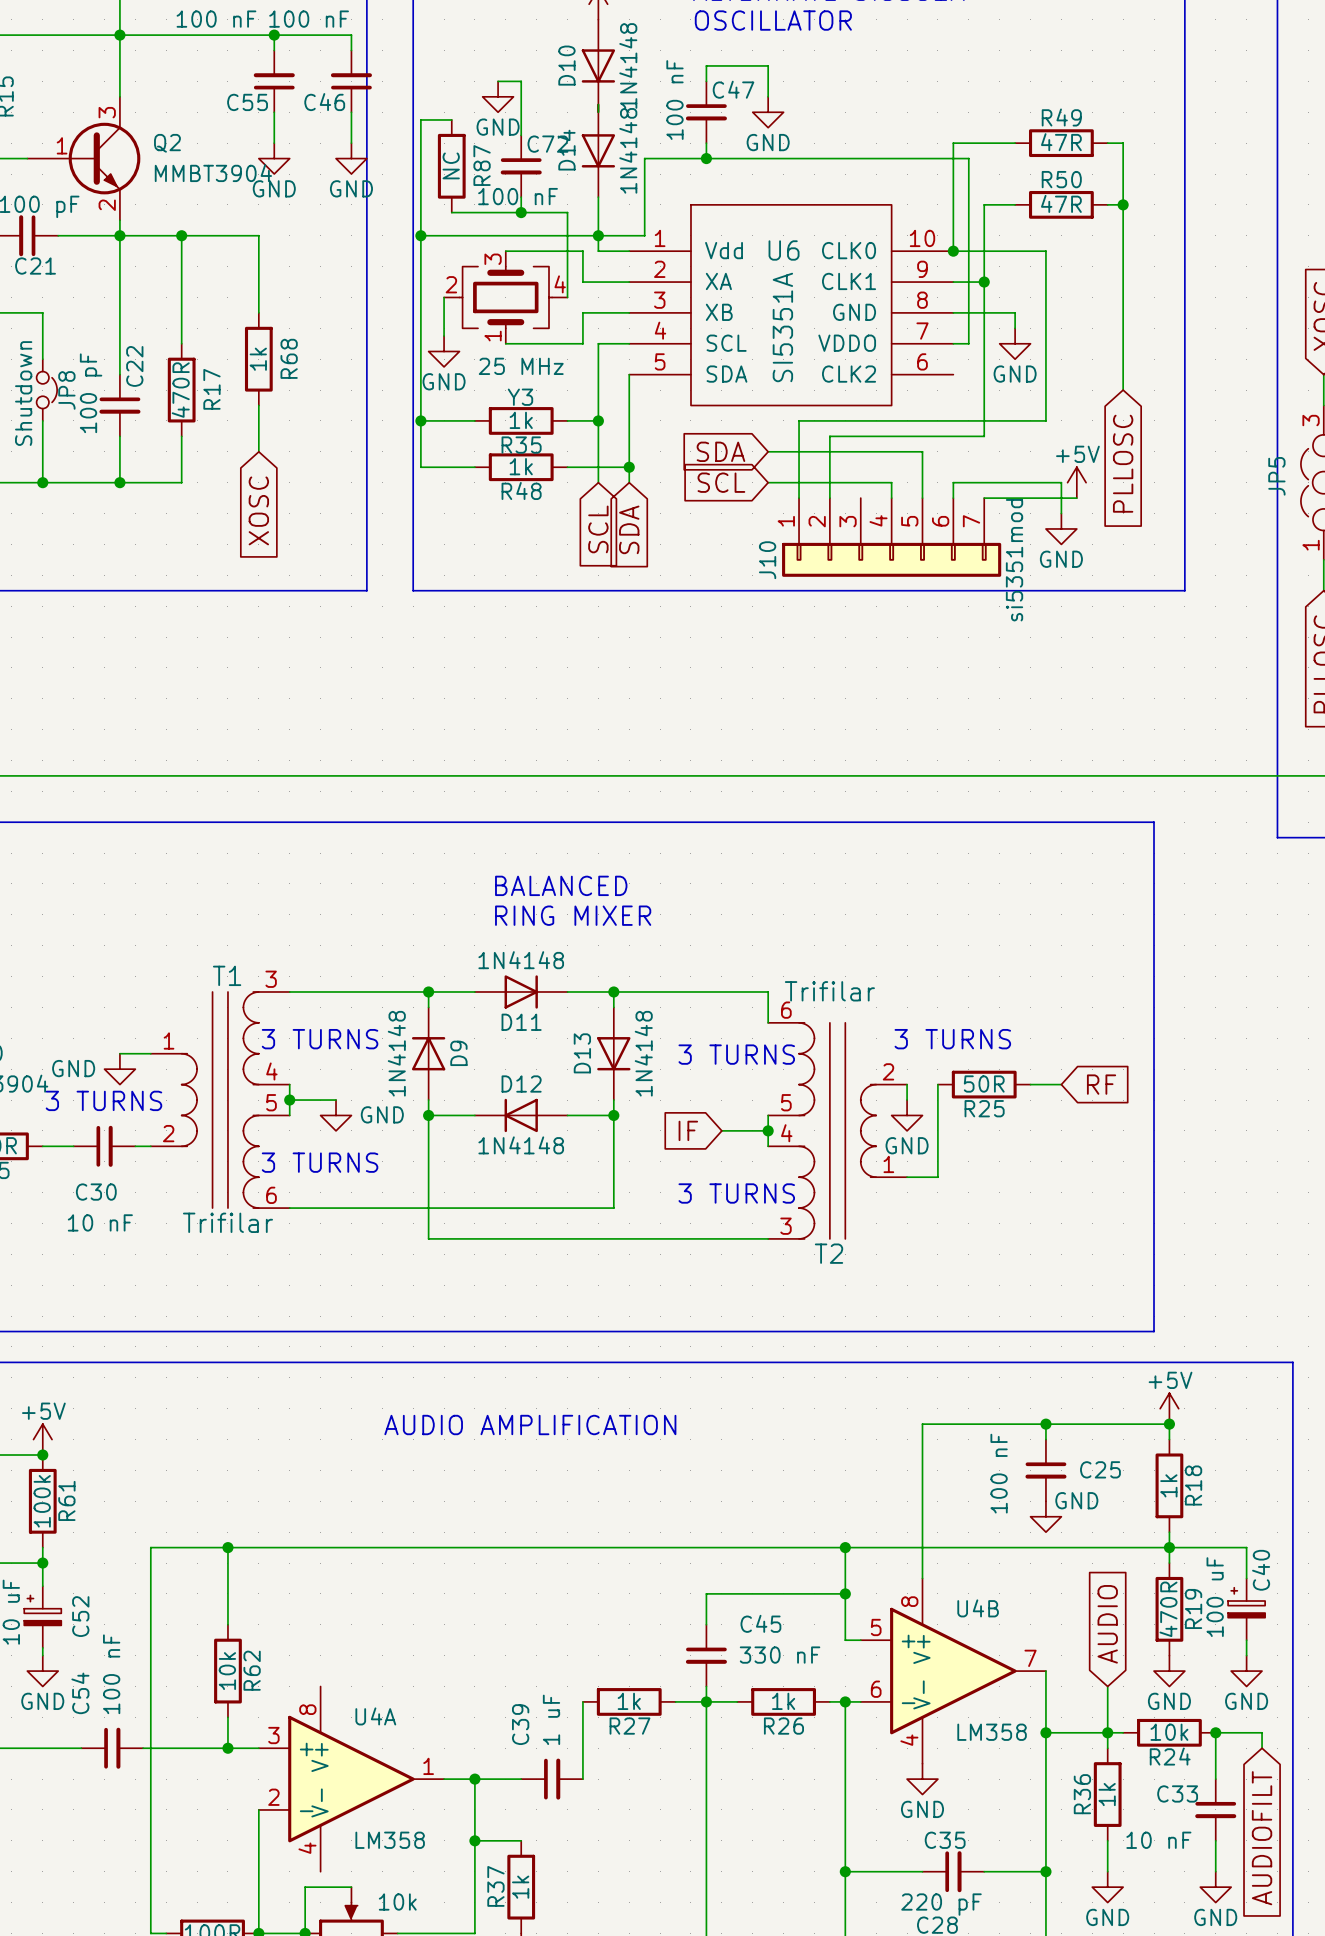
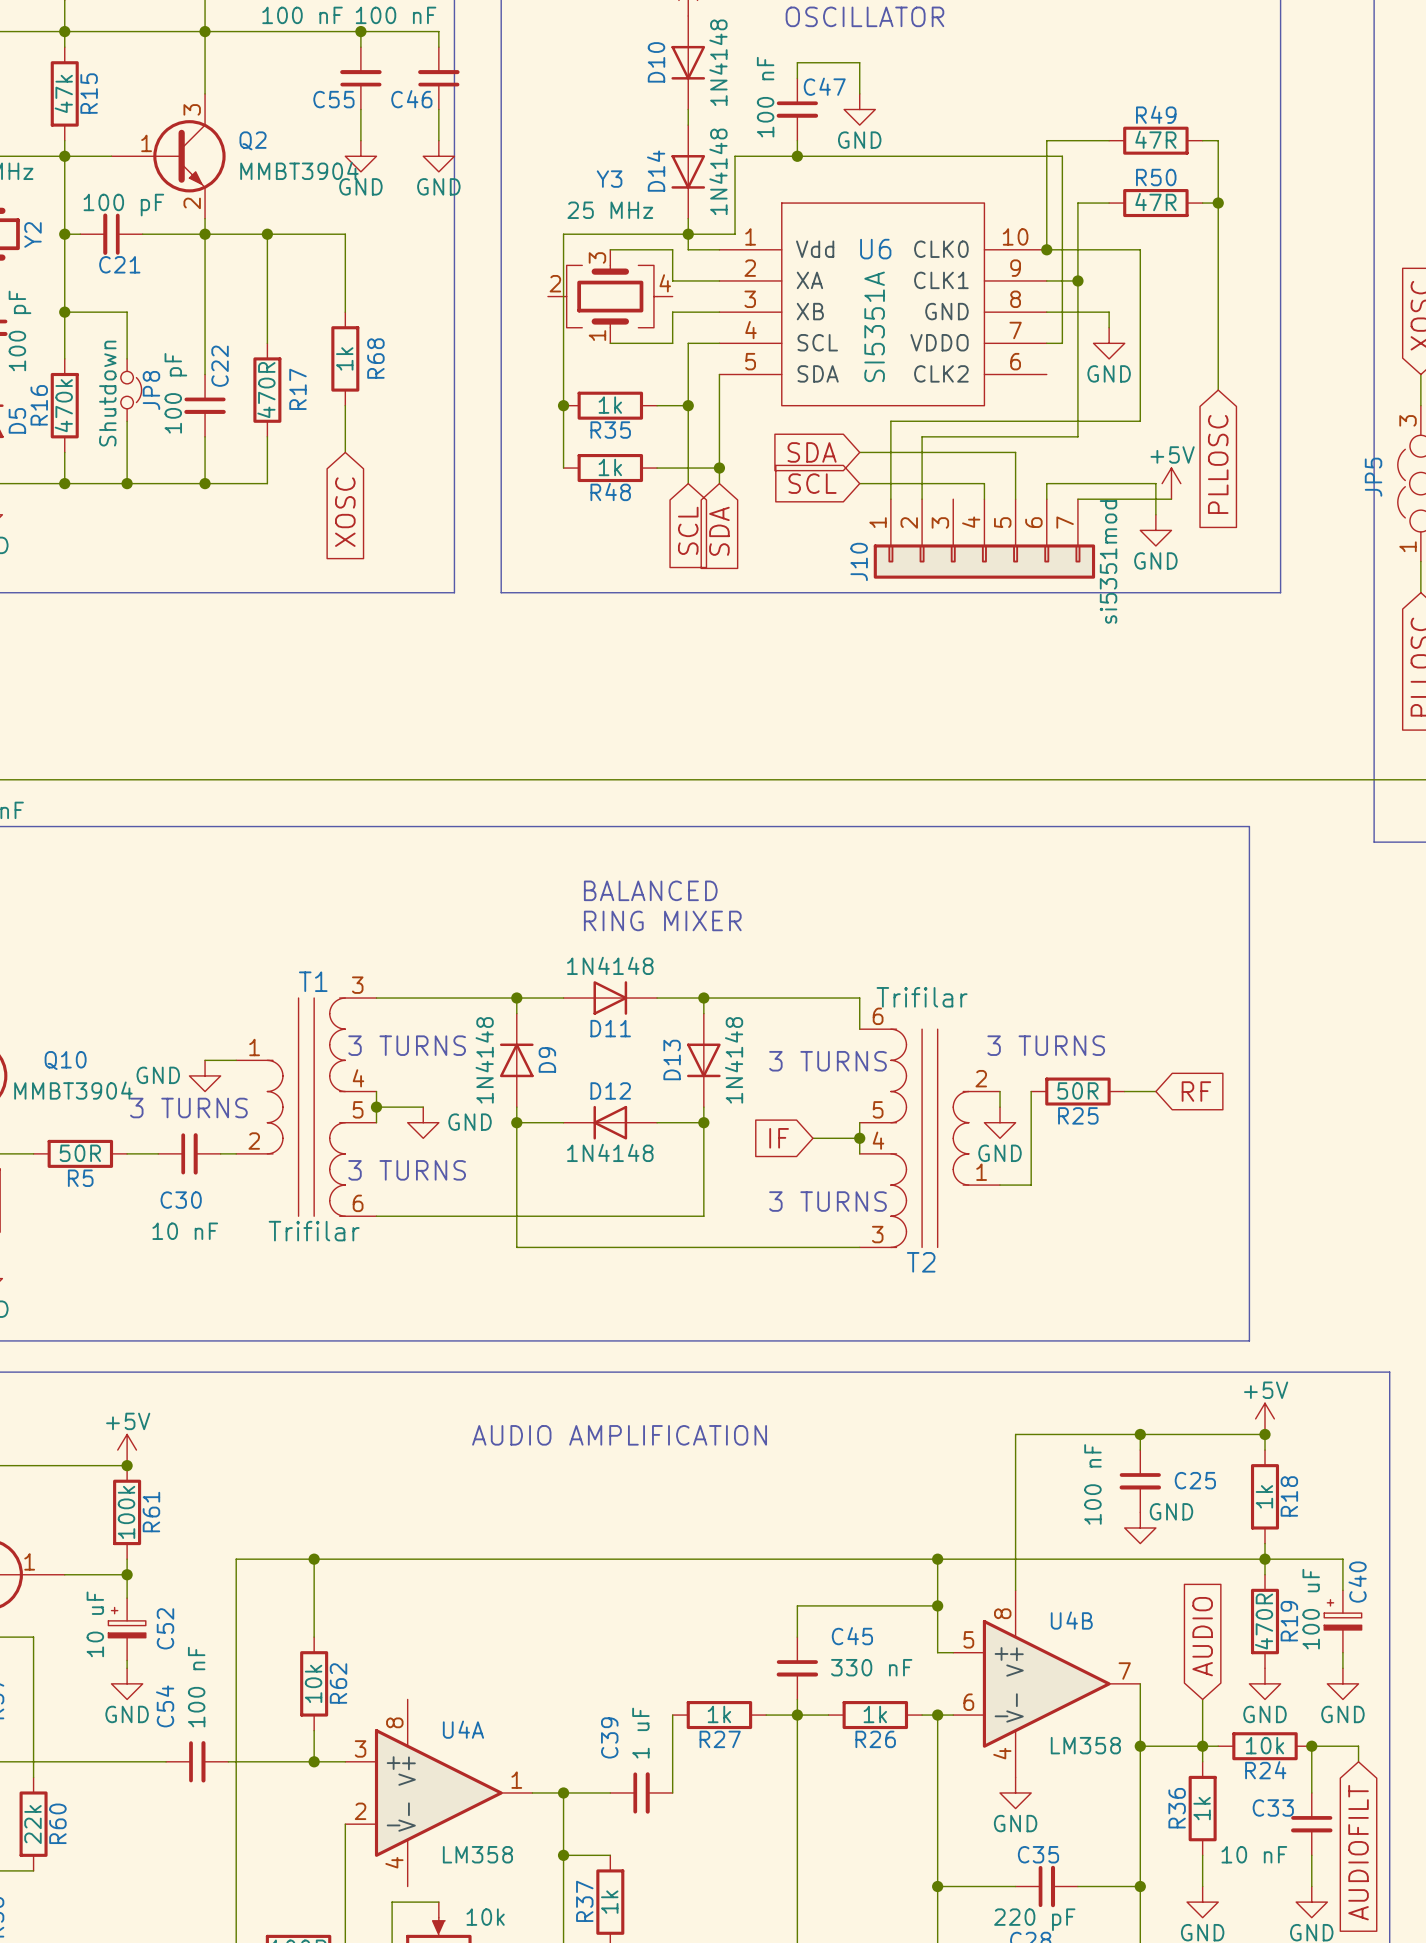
wire: (498, 81) (521, 81) (521, 135) -> none
power symbol: GND (498, 96) -> none
wire: (451, 119) (420, 119) (420, 467) (474, 467) -> (563, 234) (563, 468)
D14 position: (598, 150) -> (688, 171)
R87: NC (451, 166) -> none
C72: 100 nF (521, 166) -> none
wire: (521, 197) (521, 212) -> none
wire: (451, 212) (567, 212) (567, 297) -> none
junction: (521, 212) -> none
wire: (420, 235) (474, 235) -> none
junction: (420, 235) -> none
wire: (505, 251) (521, 251) -> none
wire: (444, 297) (444, 336) -> none
Y3 position: (505, 297) -> (610, 296)
wire: (505, 343) (521, 343) -> none
power symbol: GND (444, 351) -> none
Y3 value position: 25 MHz (521, 366) -> 25 MHz (610, 210)
Y3 name position: Y3 (520, 397) -> Y3 (609, 179)
wire: (420, 420) (474, 420) -> none
junction position: (420, 420) -> (563, 405)
R35 position: (521, 420) -> (610, 405)
wire: (567, 420) (598, 420) -> (657, 405) (688, 405)
junction position: (598, 420) -> (688, 405)

